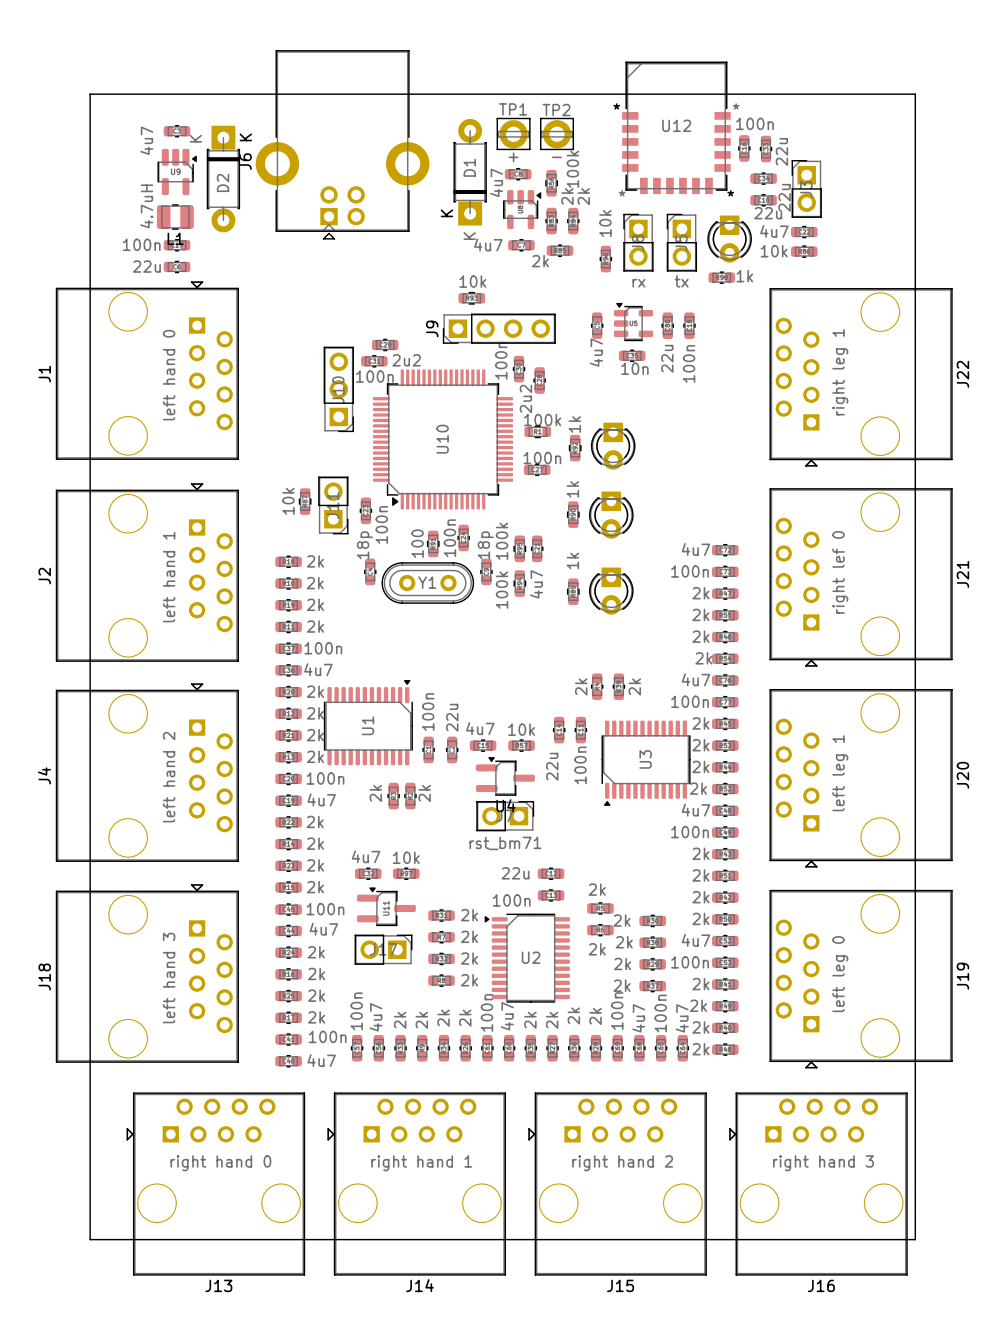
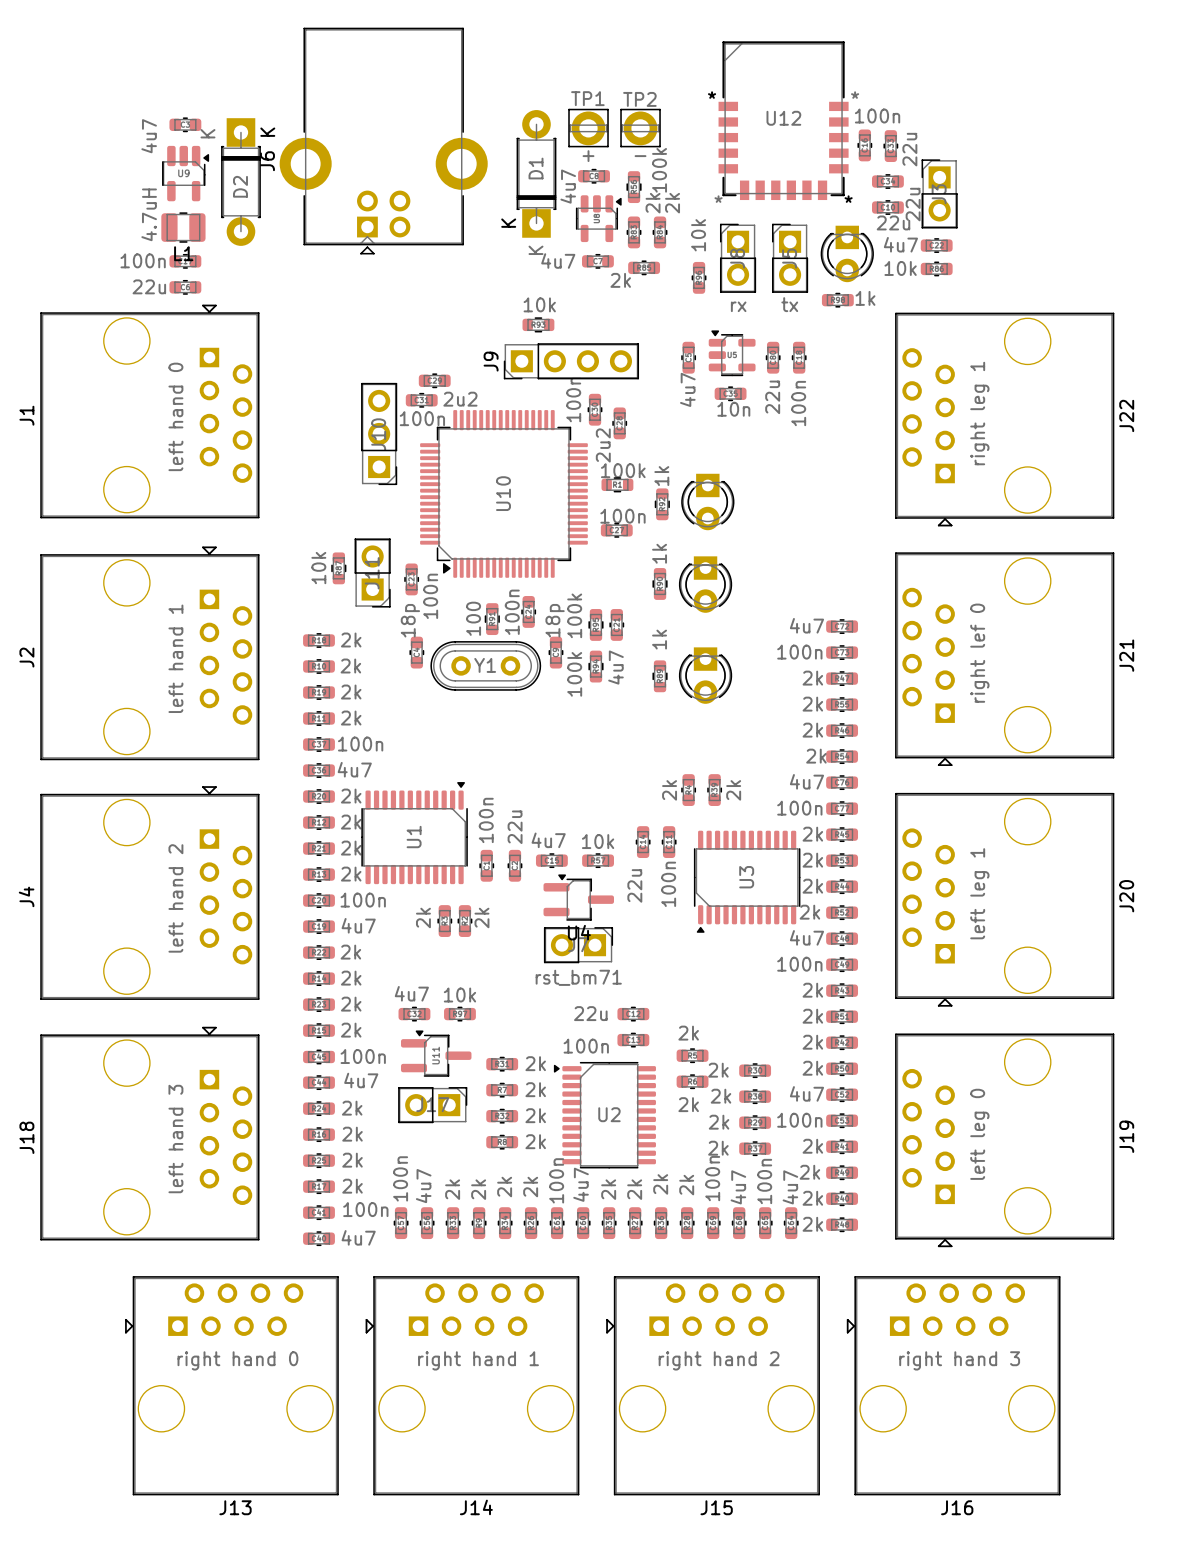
board edge: (90, 94) (915, 94) (915, 1239) (90, 1239) (90, 94) -> none

